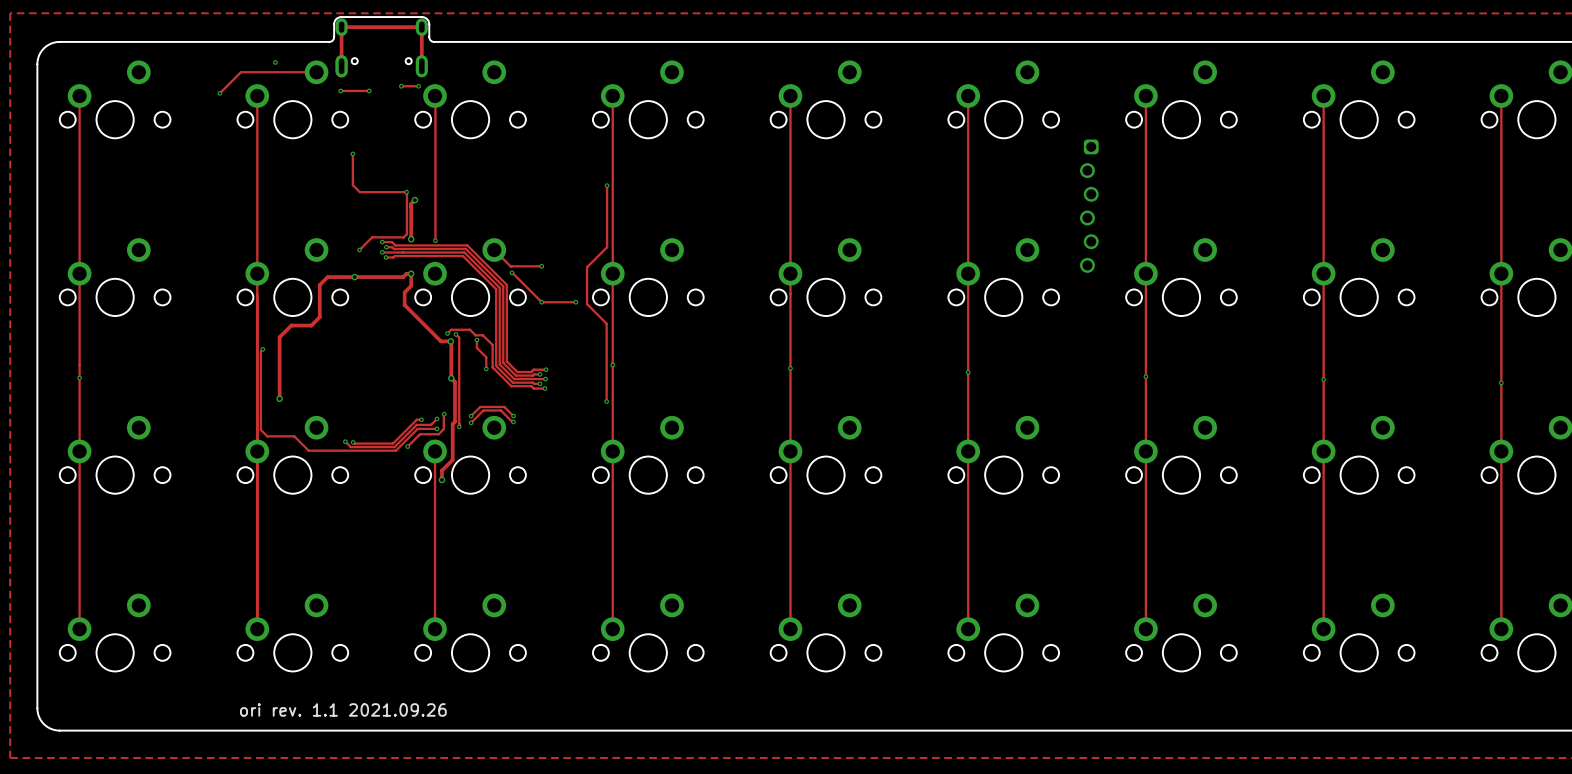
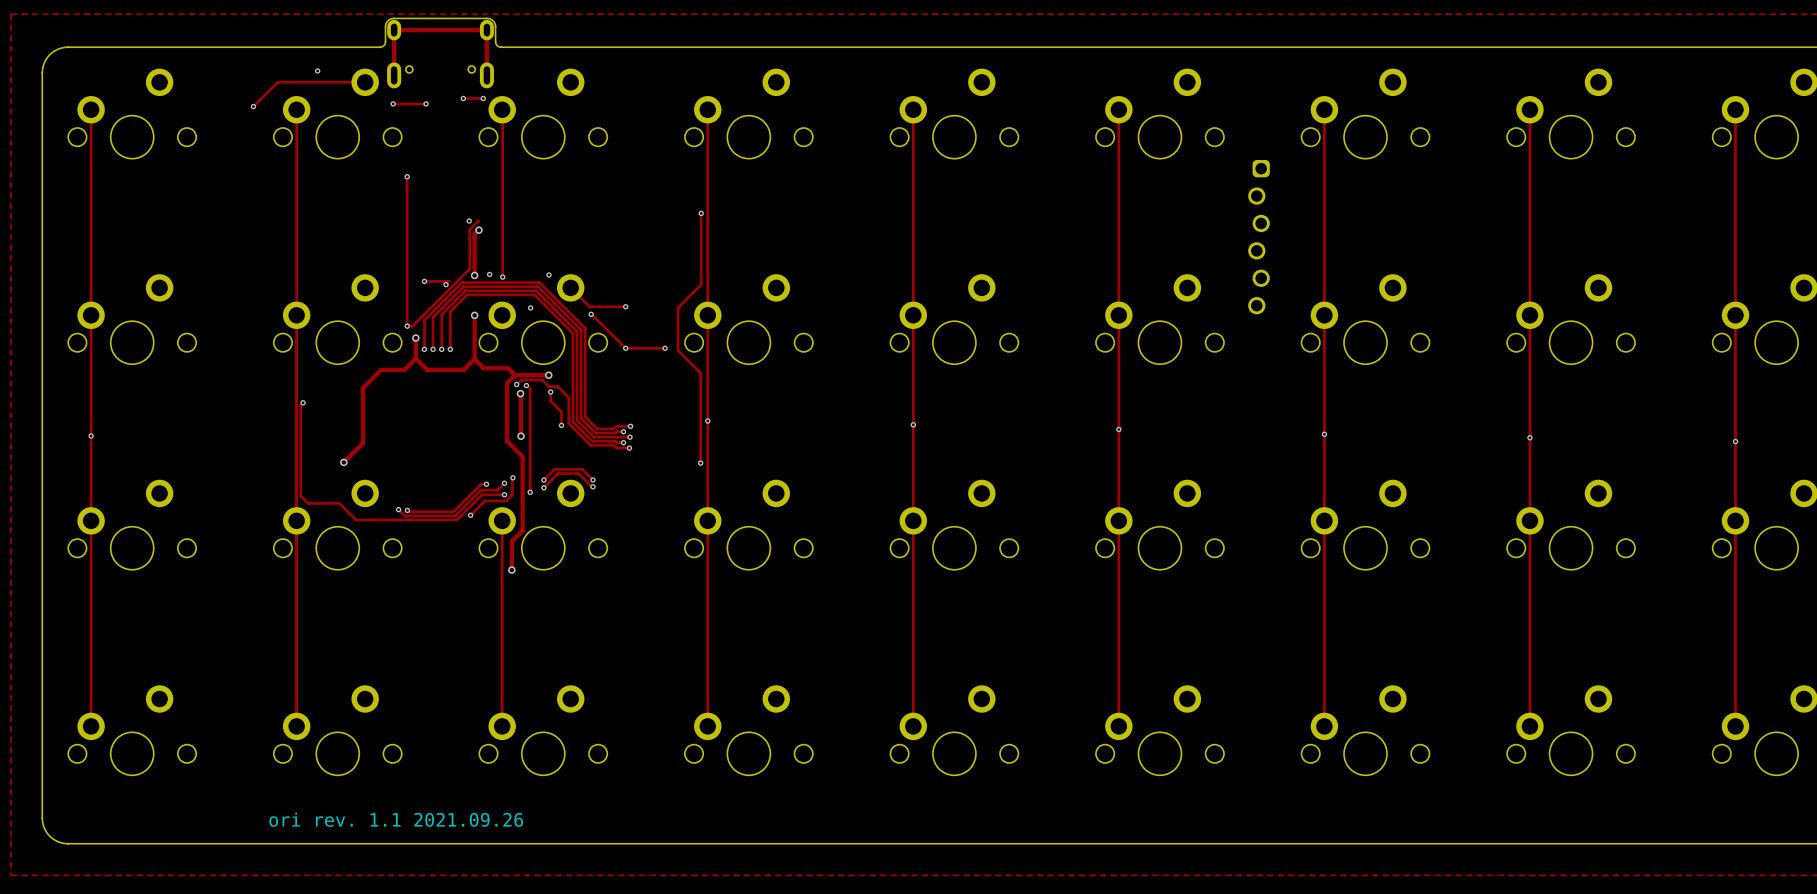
track: (352, 185) (359, 192) (406, 192) (406, 199) -> (407, 212) (407, 326) (412, 326) (469, 269)
track: none -> (478, 220) (469, 229)
track: (406, 233) (403, 237) (372, 237) (359, 250) -> none
via: none -> (489, 274)
via: none -> (548, 275)
track: (382, 242) (391, 242) (395, 245) (400, 245) -> (424, 349) (424, 320) (461, 282)
via: (382, 242) -> none
track: none -> (424, 281) (449, 281)
via: none -> (424, 281)
track: (386, 247) (401, 248) -> (433, 349) (433, 317) (463, 286)
via: (359, 250) -> none
track: (382, 252) (403, 252) -> (441, 349) (441, 314) (465, 290)
via: (382, 252) -> none
track: (404, 256) (386, 257) -> (467, 294) (450, 311) (450, 349)
via: (386, 257) -> none
via: none -> (530, 307)
via position: (354, 277) -> (415, 338)
track: (411, 278) (411, 273) (406, 273) (403, 277) (327, 277) (319, 284) (319, 317) (311, 325) (291, 325) (279, 337) (279, 398) -> none
via: none -> (407, 326)
track: (411, 285) (404, 292) (404, 305) (411, 311) -> (474, 329) (474, 359) (463, 369) (427, 369) (415, 358)
track: none -> (415, 338) (415, 358)
via: none -> (424, 349)
via: none -> (433, 349)
via: none -> (441, 349)
via: none -> (450, 349)
track: none -> (415, 358) (404, 369) (381, 369) (362, 388) (362, 443) (343, 462)
track: (419, 319) (441, 341) (450, 341) -> (483, 368) (508, 368) (515, 375)
track: none -> (515, 375) (548, 375)
via: none -> (548, 375)
track: (451, 378) (454, 381) (454, 421) (452, 423) -> (515, 375) (507, 383) (507, 441) (522, 456) (522, 489)
via position: (279, 398) -> (343, 462)
track: (443, 469) (441, 479) -> (511, 541) (511, 570)
via position: (441, 479) -> (511, 570)

